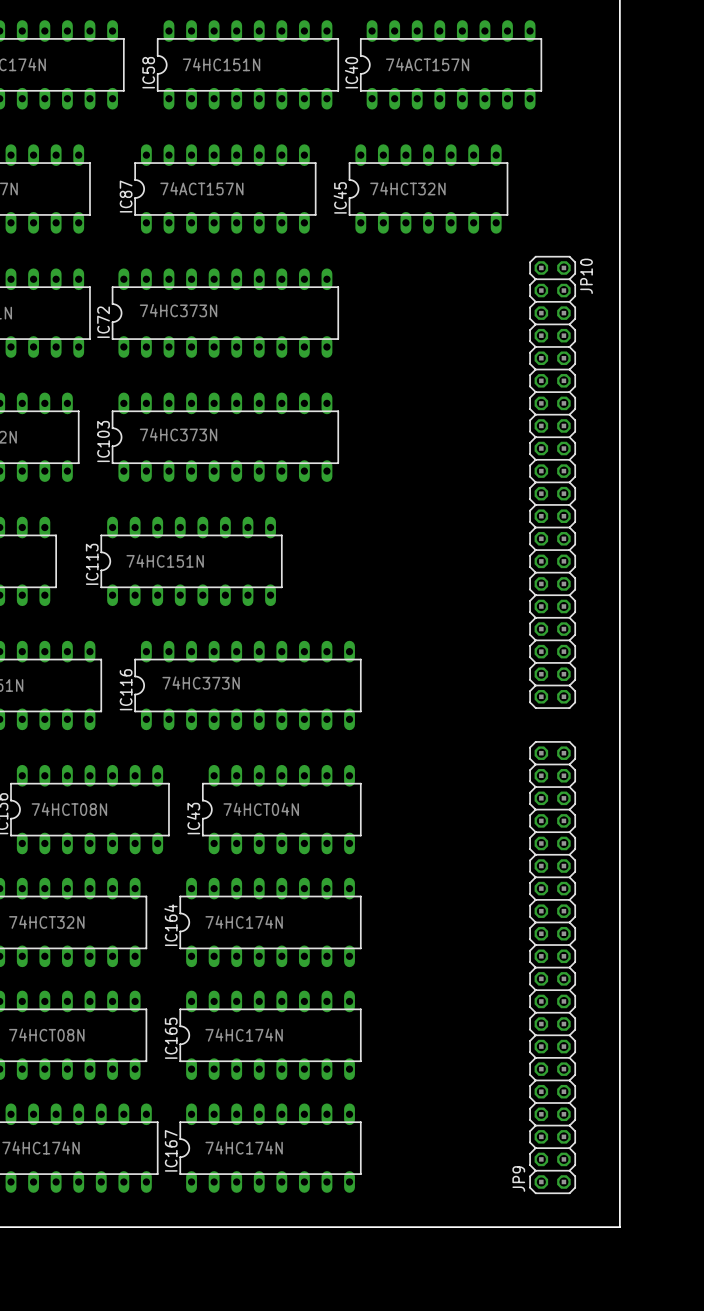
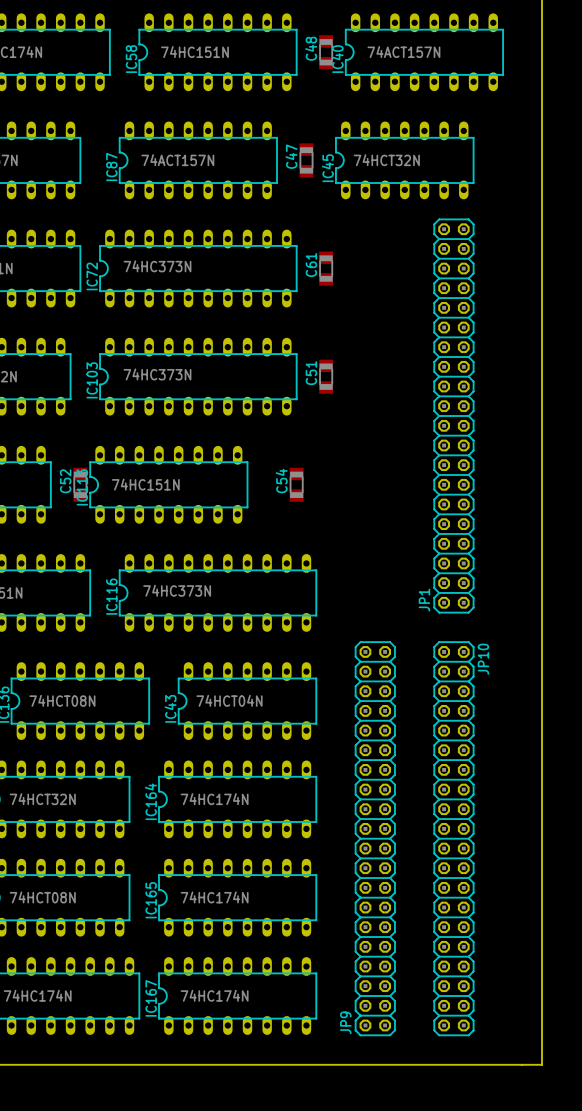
C48: none -> (326, 52)
IC40 position: (451, 64) -> (424, 52)
C47: none -> (306, 160)
IC45 position: (428, 188) -> (404, 160)
C61: none -> (326, 268)
C51: none -> (326, 376)
JP1: none -> (453, 416)
JP10 position: (552, 482) -> (453, 838)
C52: none -> (80, 484)
C54: none -> (296, 484)
JP9 position: (552, 967) -> (375, 838)

